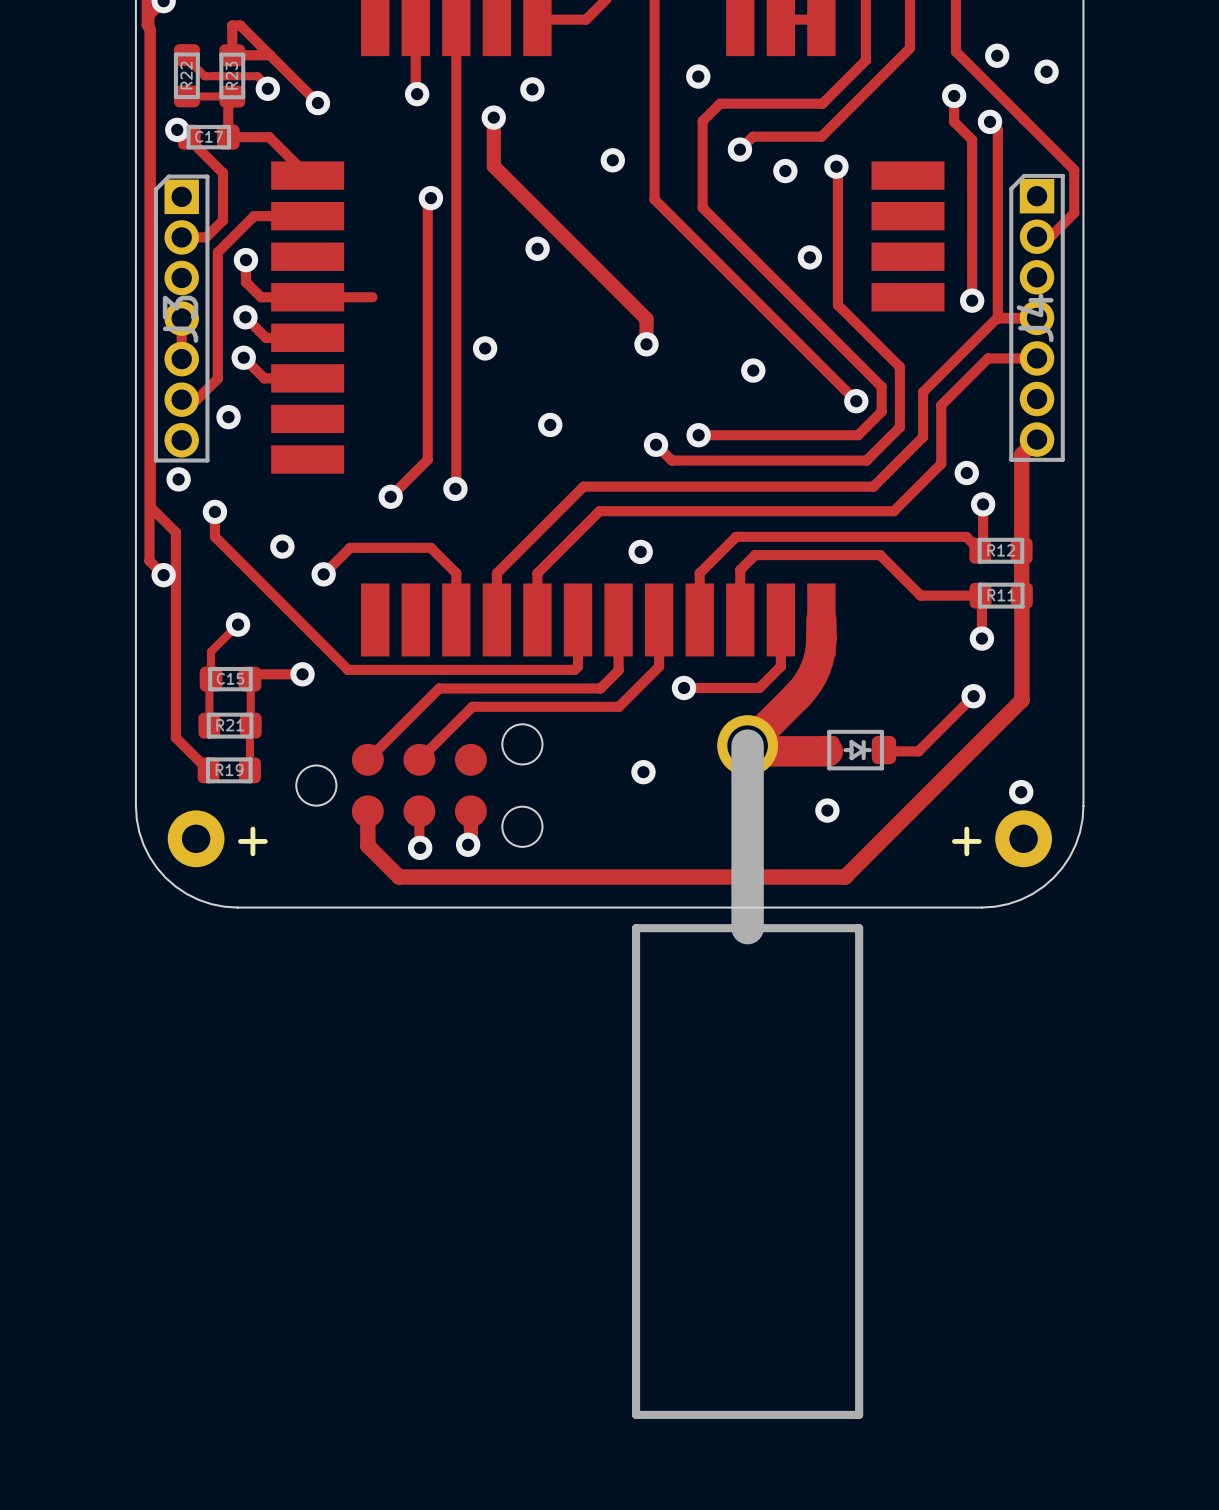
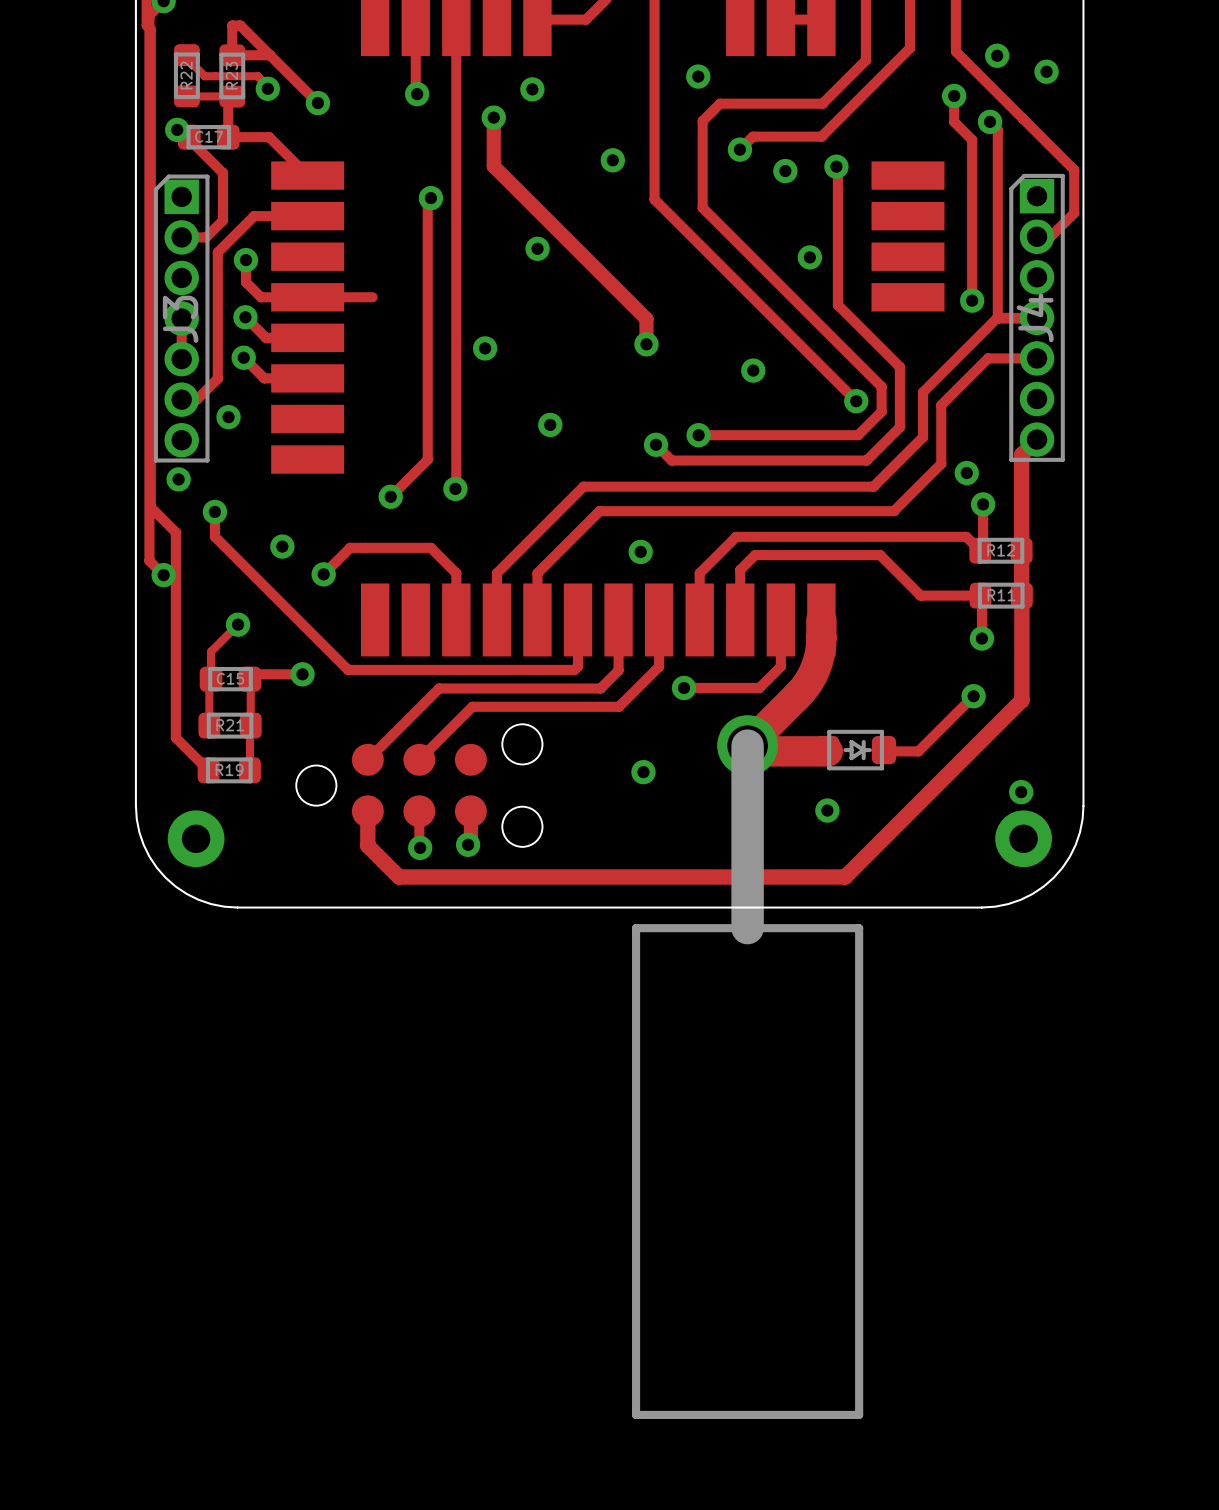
text: + (252, 841) -> none
text: + (966, 841) -> none

